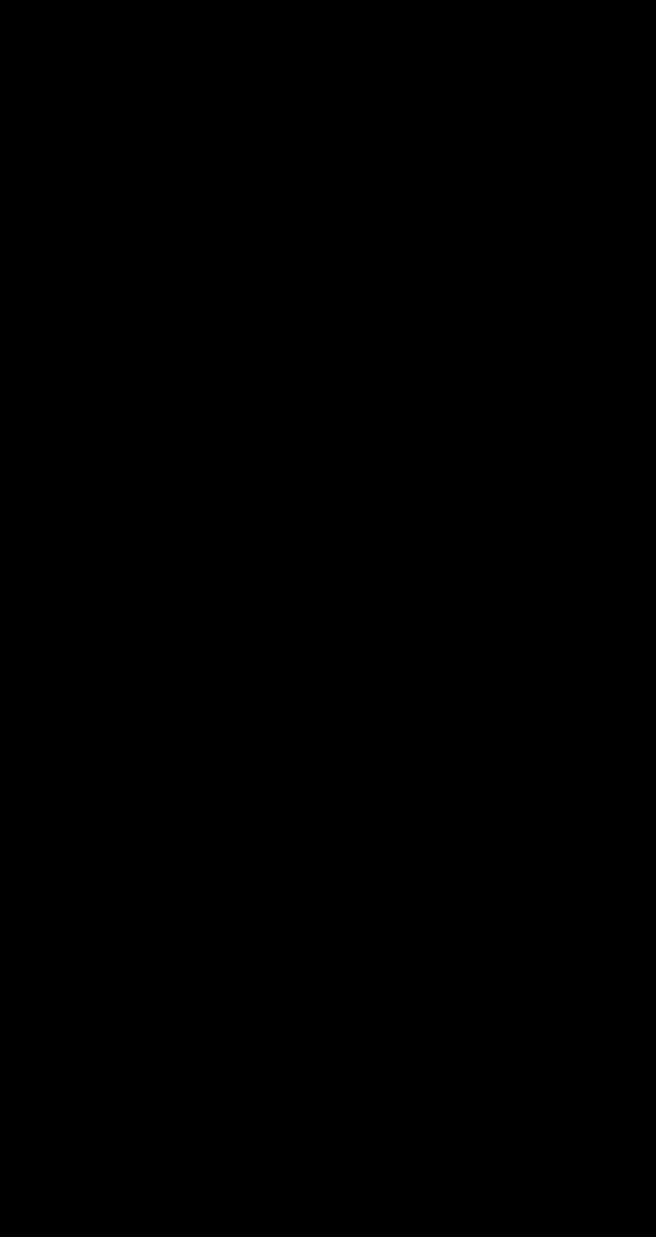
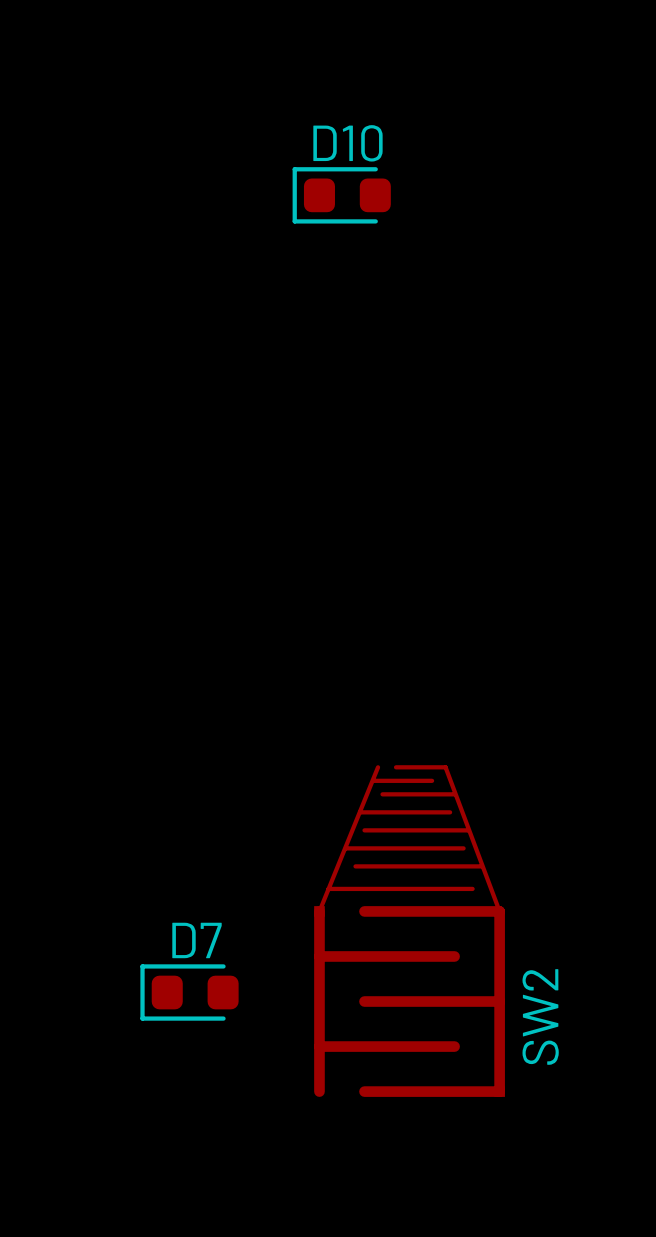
D10: none -> (341, 195)
SW2: none -> (409, 931)
D7: none -> (189, 992)

